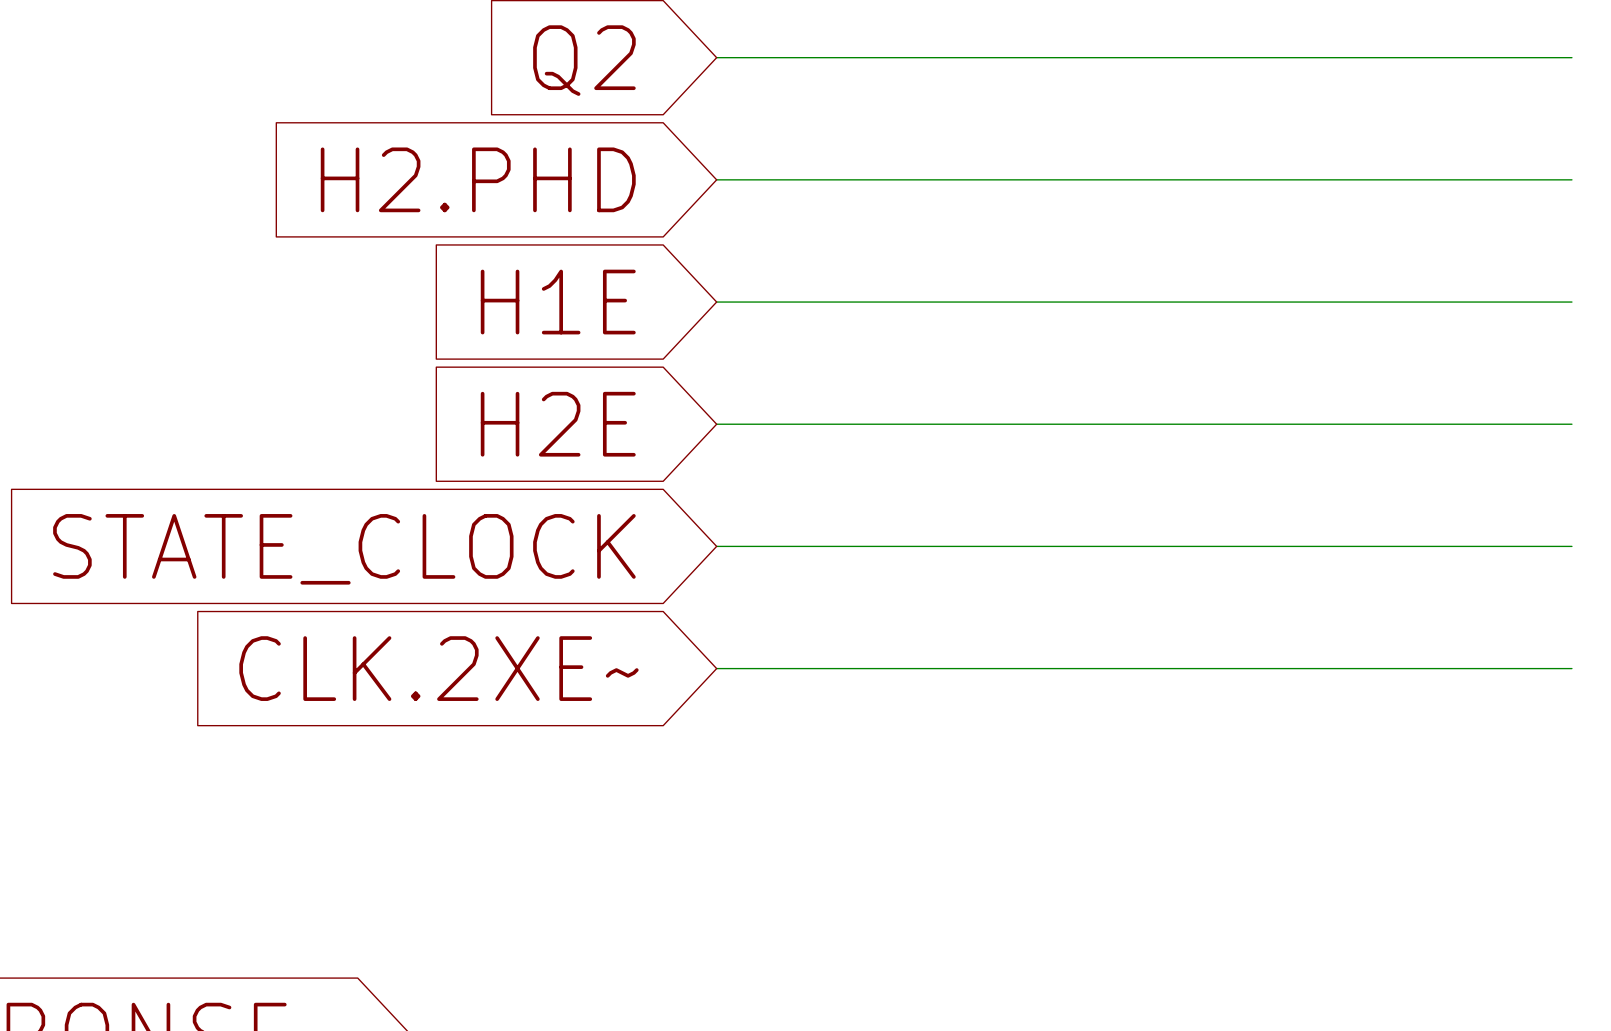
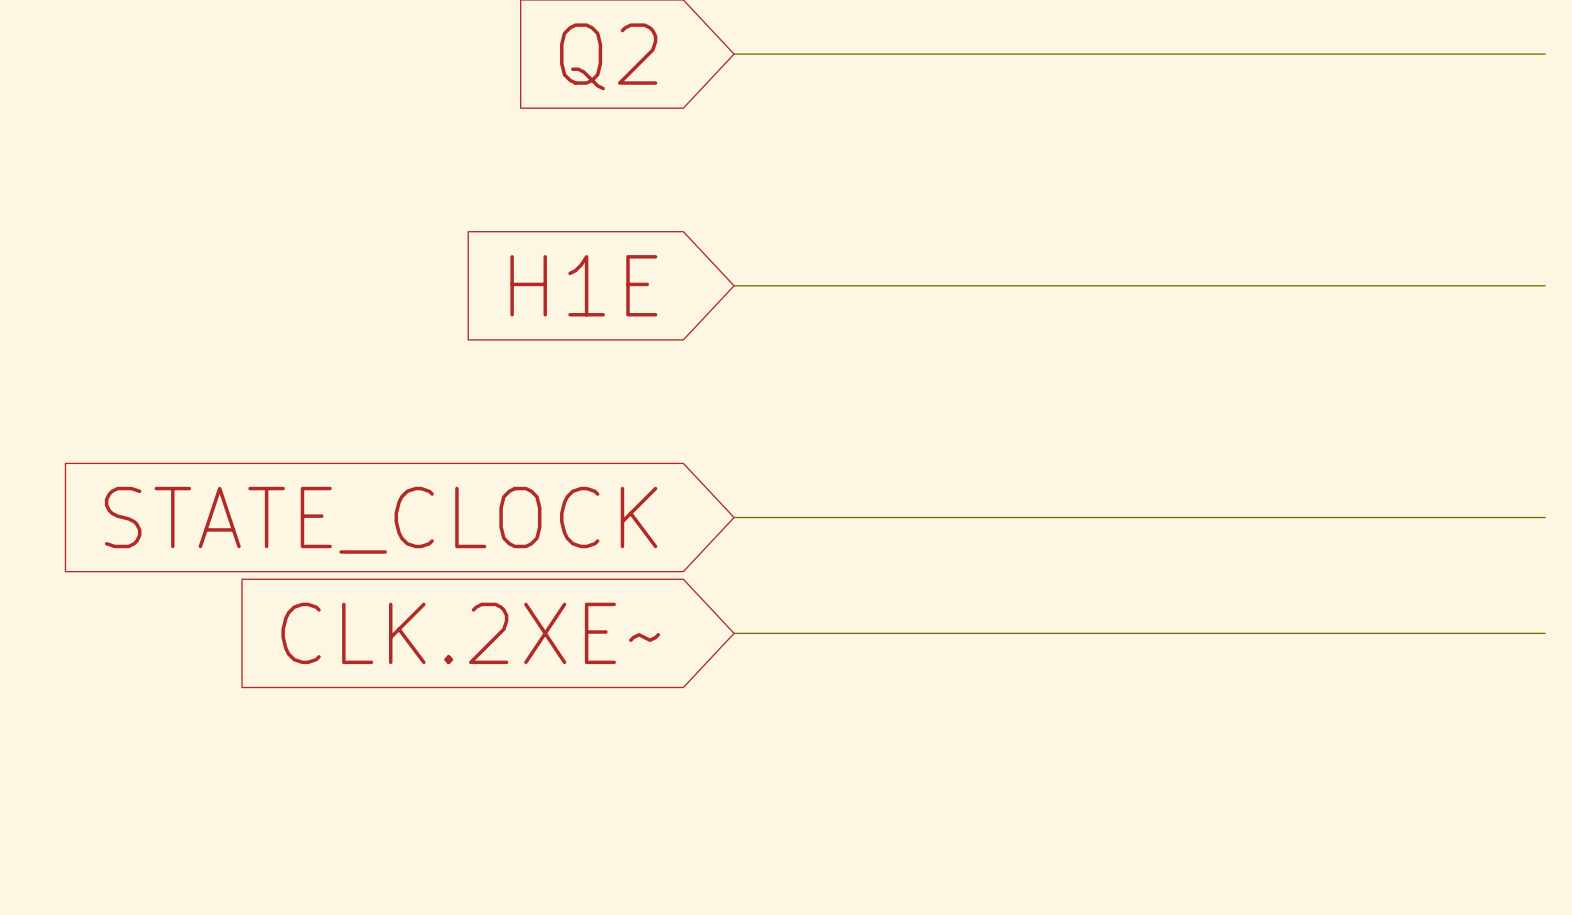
global label: H2.PHD (478, 179) -> none
wire: (716, 179) (1571, 179) -> none
global label: H2E (558, 424) -> none
wire: (716, 424) (1571, 424) -> none

